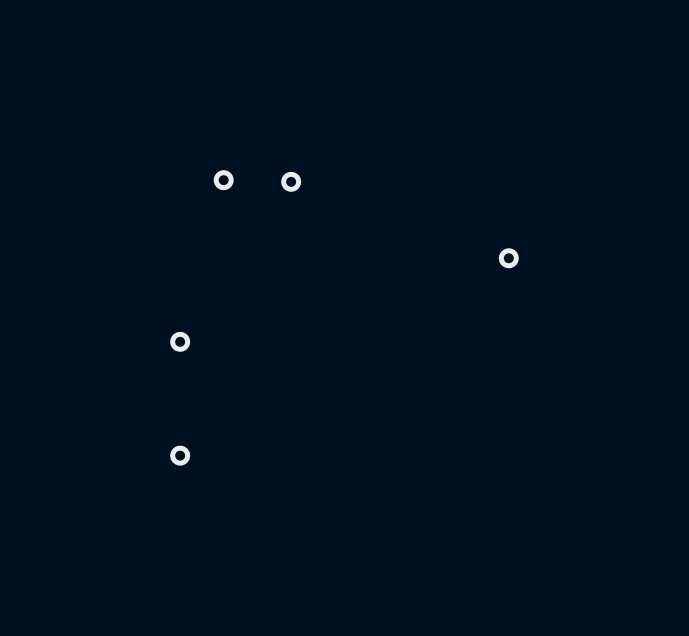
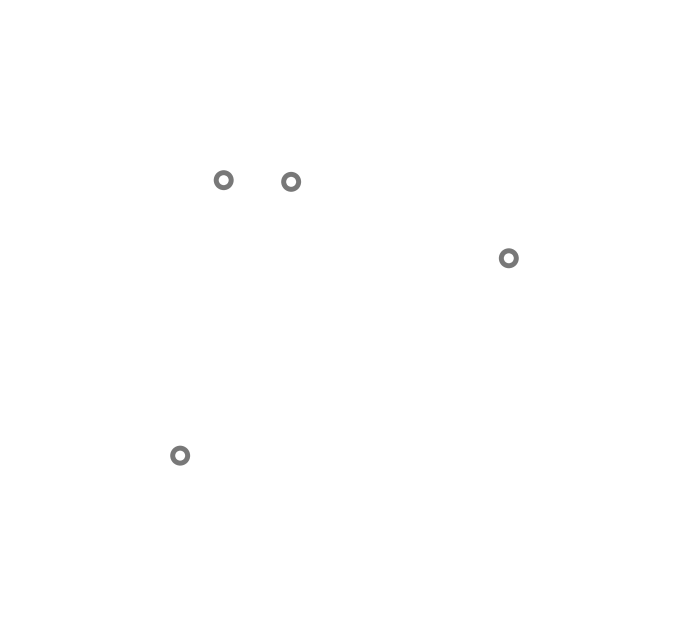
via: (180, 341) -> none

